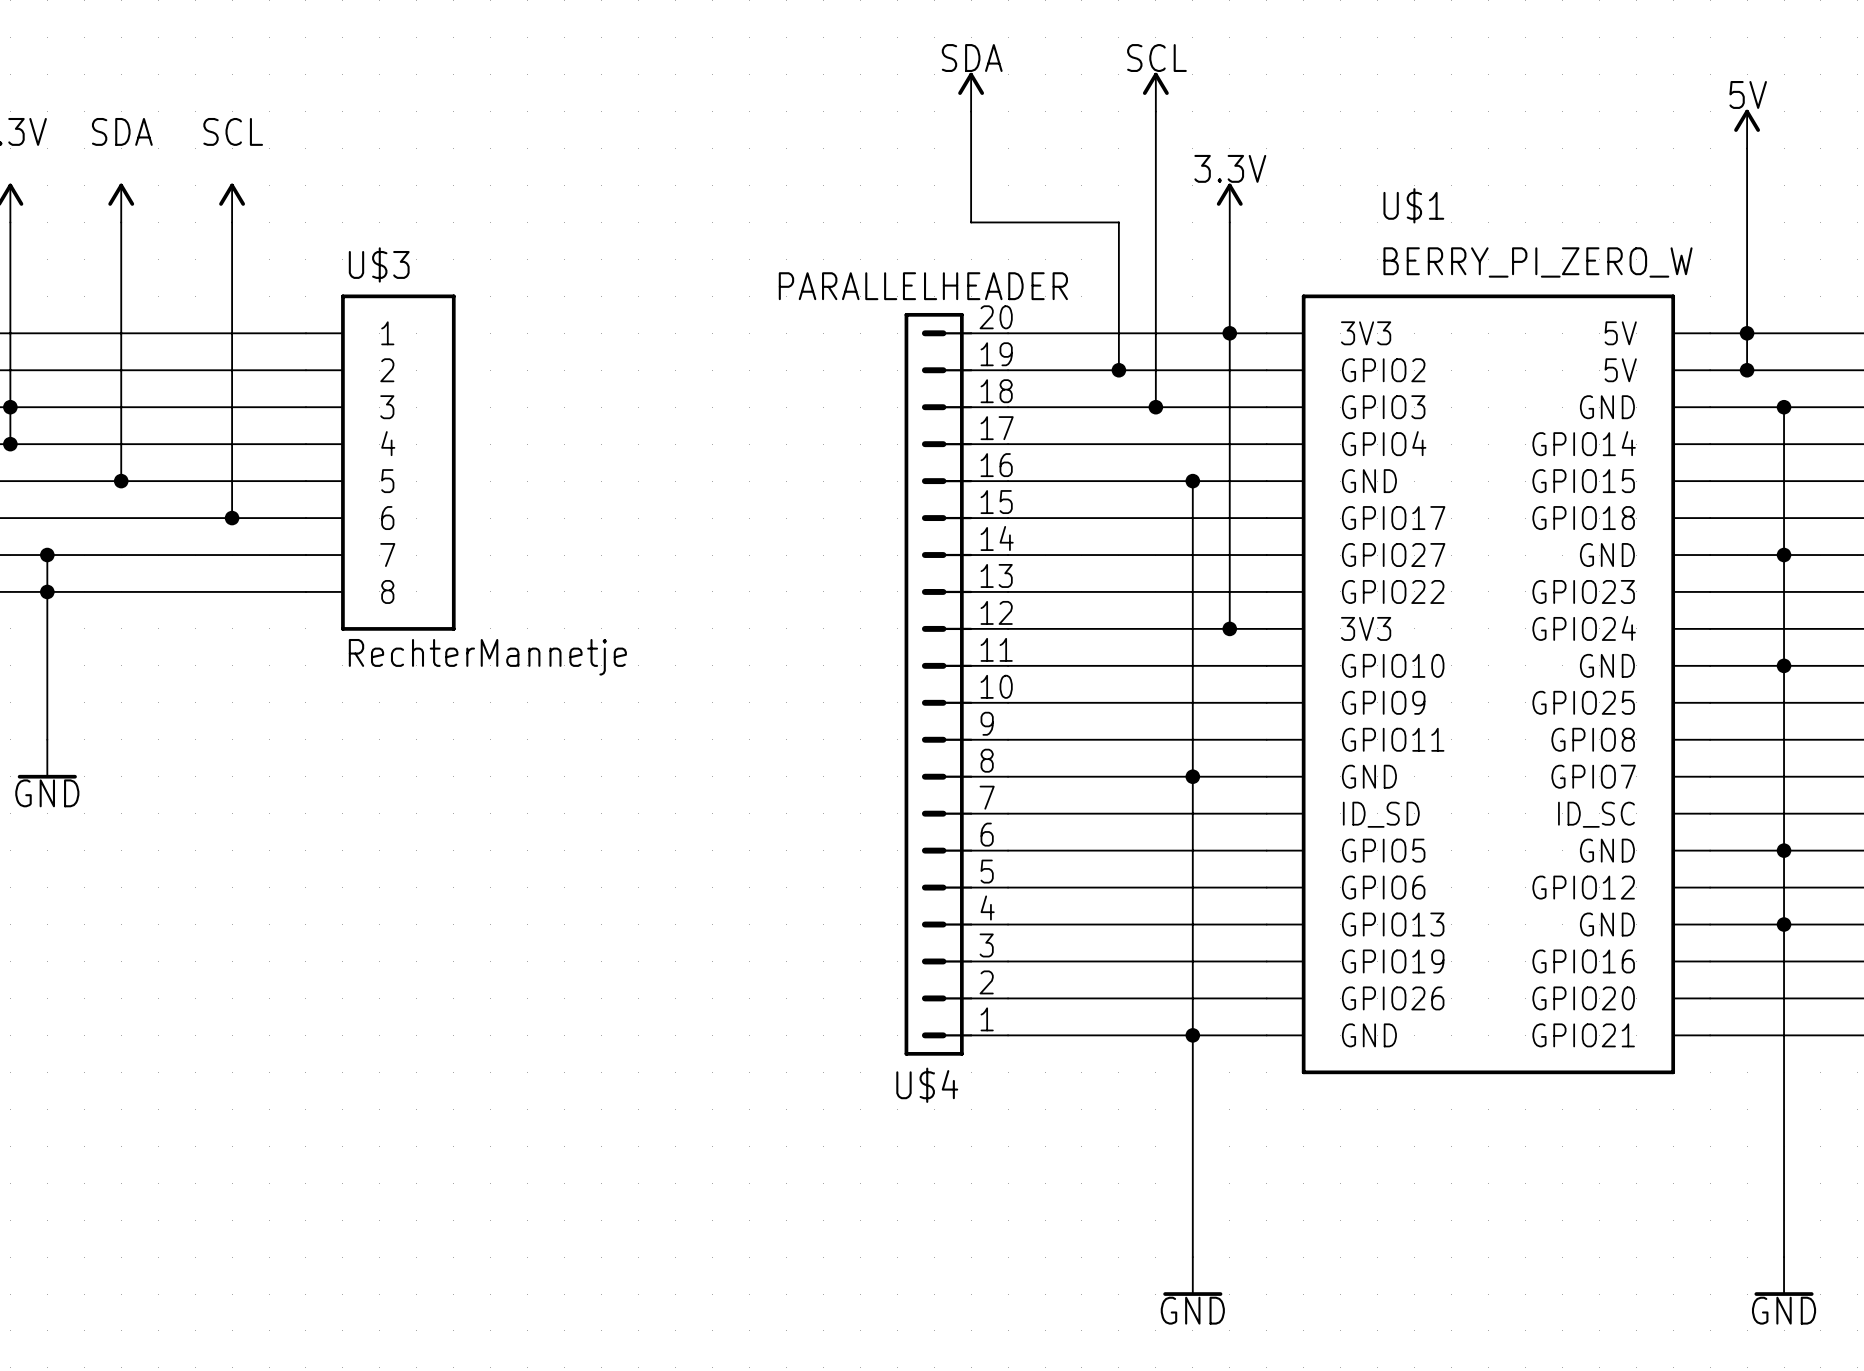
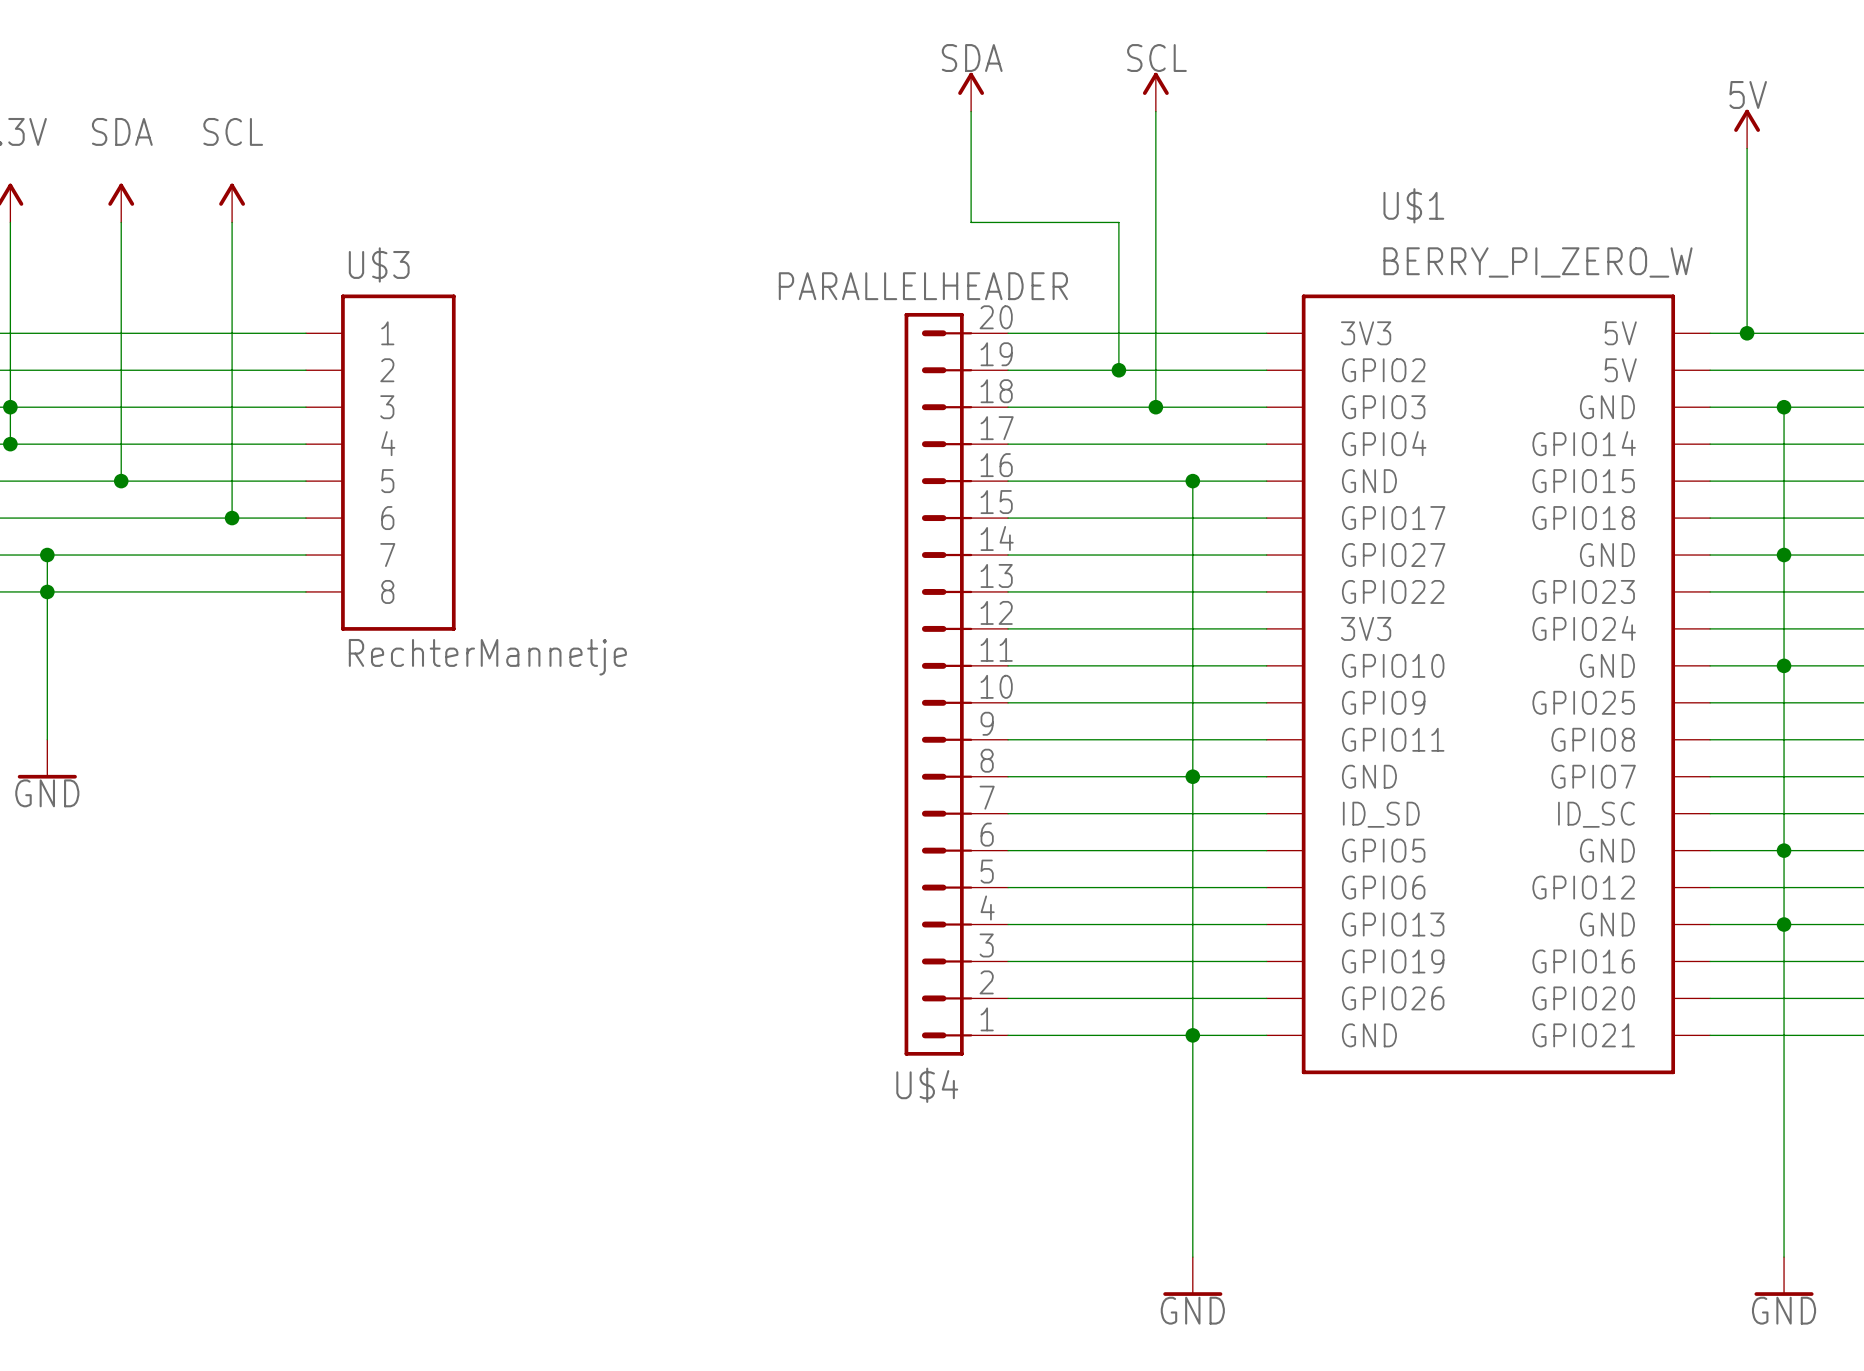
power symbol: 3.3V (1229, 203) -> none
wire: (1229, 222) (1229, 628) -> none
junction: (1229, 333) -> none
wire: (1747, 333) (1747, 370) -> none
junction: (1747, 370) -> none
junction: (1229, 628) -> none

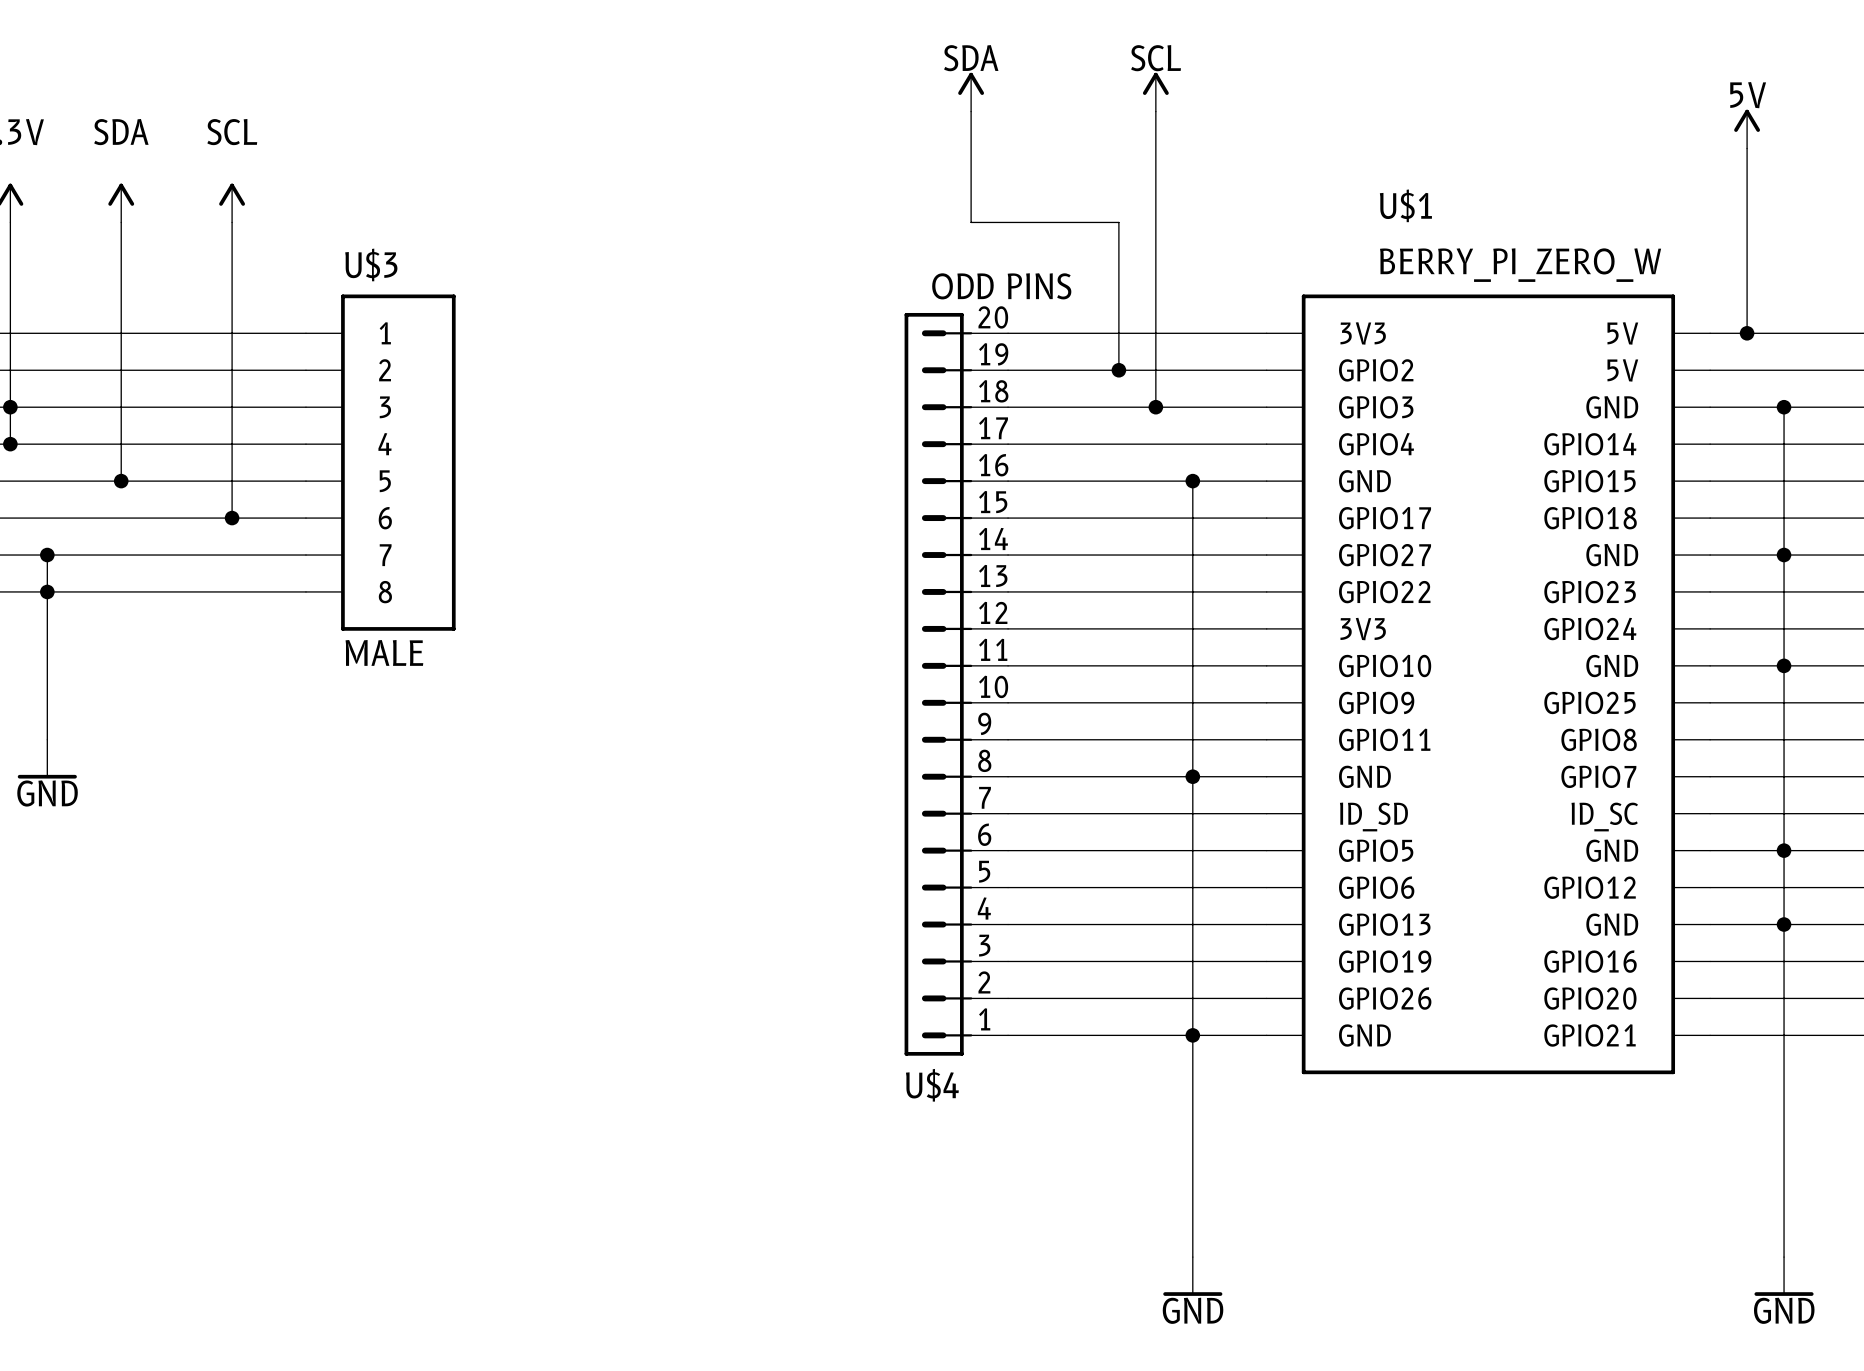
U$4 value: PARALLELHEADER (923, 286) -> ODD PINS (1001, 286)
U$3 value: RechterMannetje (487, 657) -> MALE (384, 652)

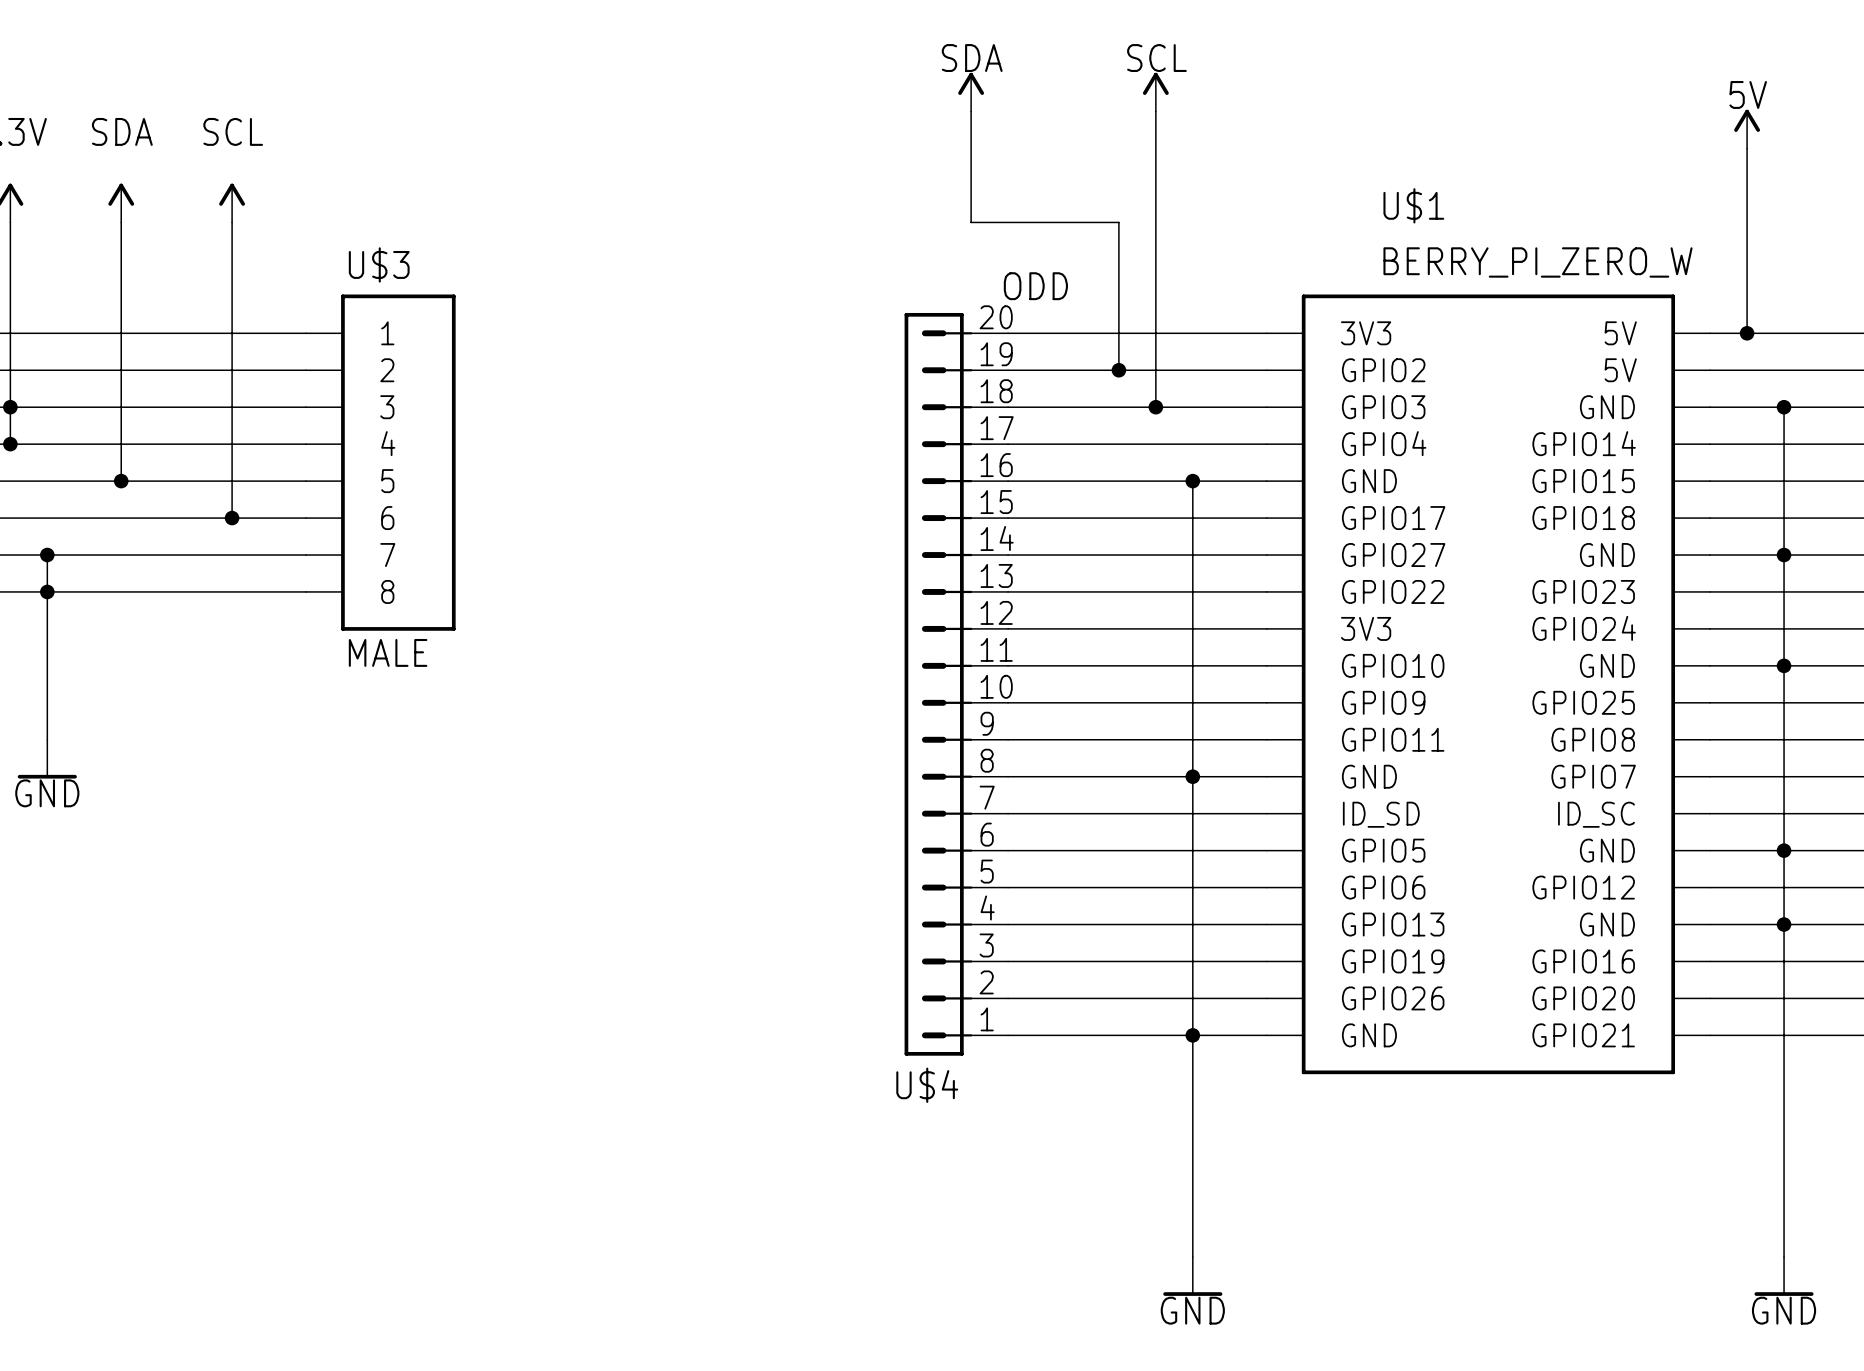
U$4 value: ODD PINS (1001, 286) -> ODD (1035, 286)

